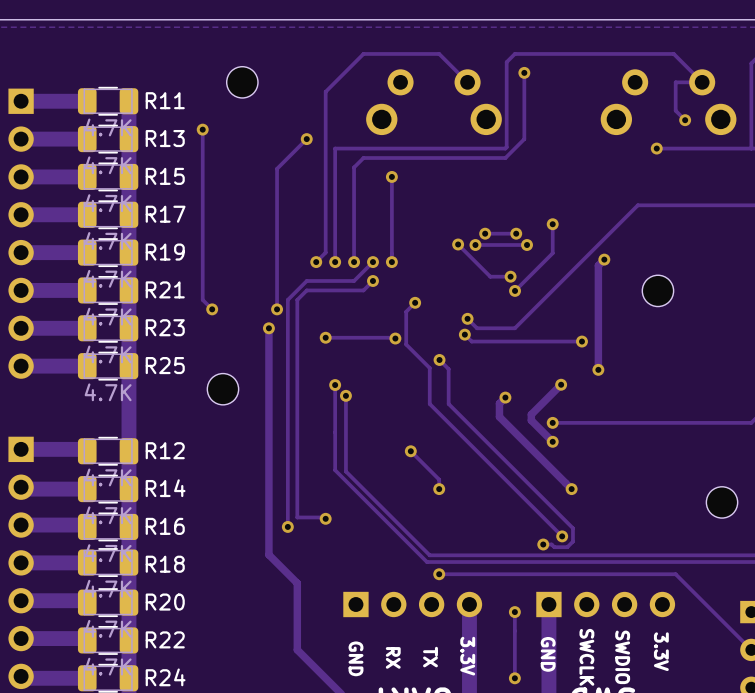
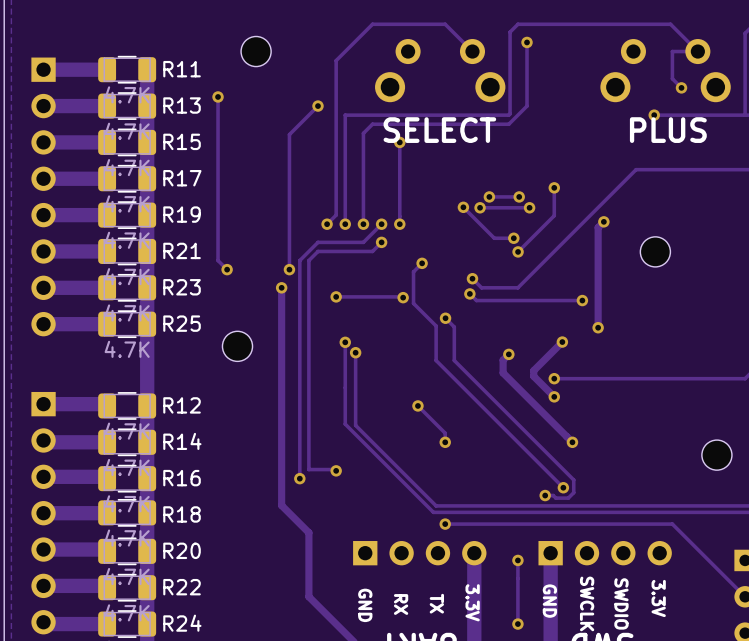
text: none -> SELECT (439, 130)
text: none -> PLUS (668, 130)

